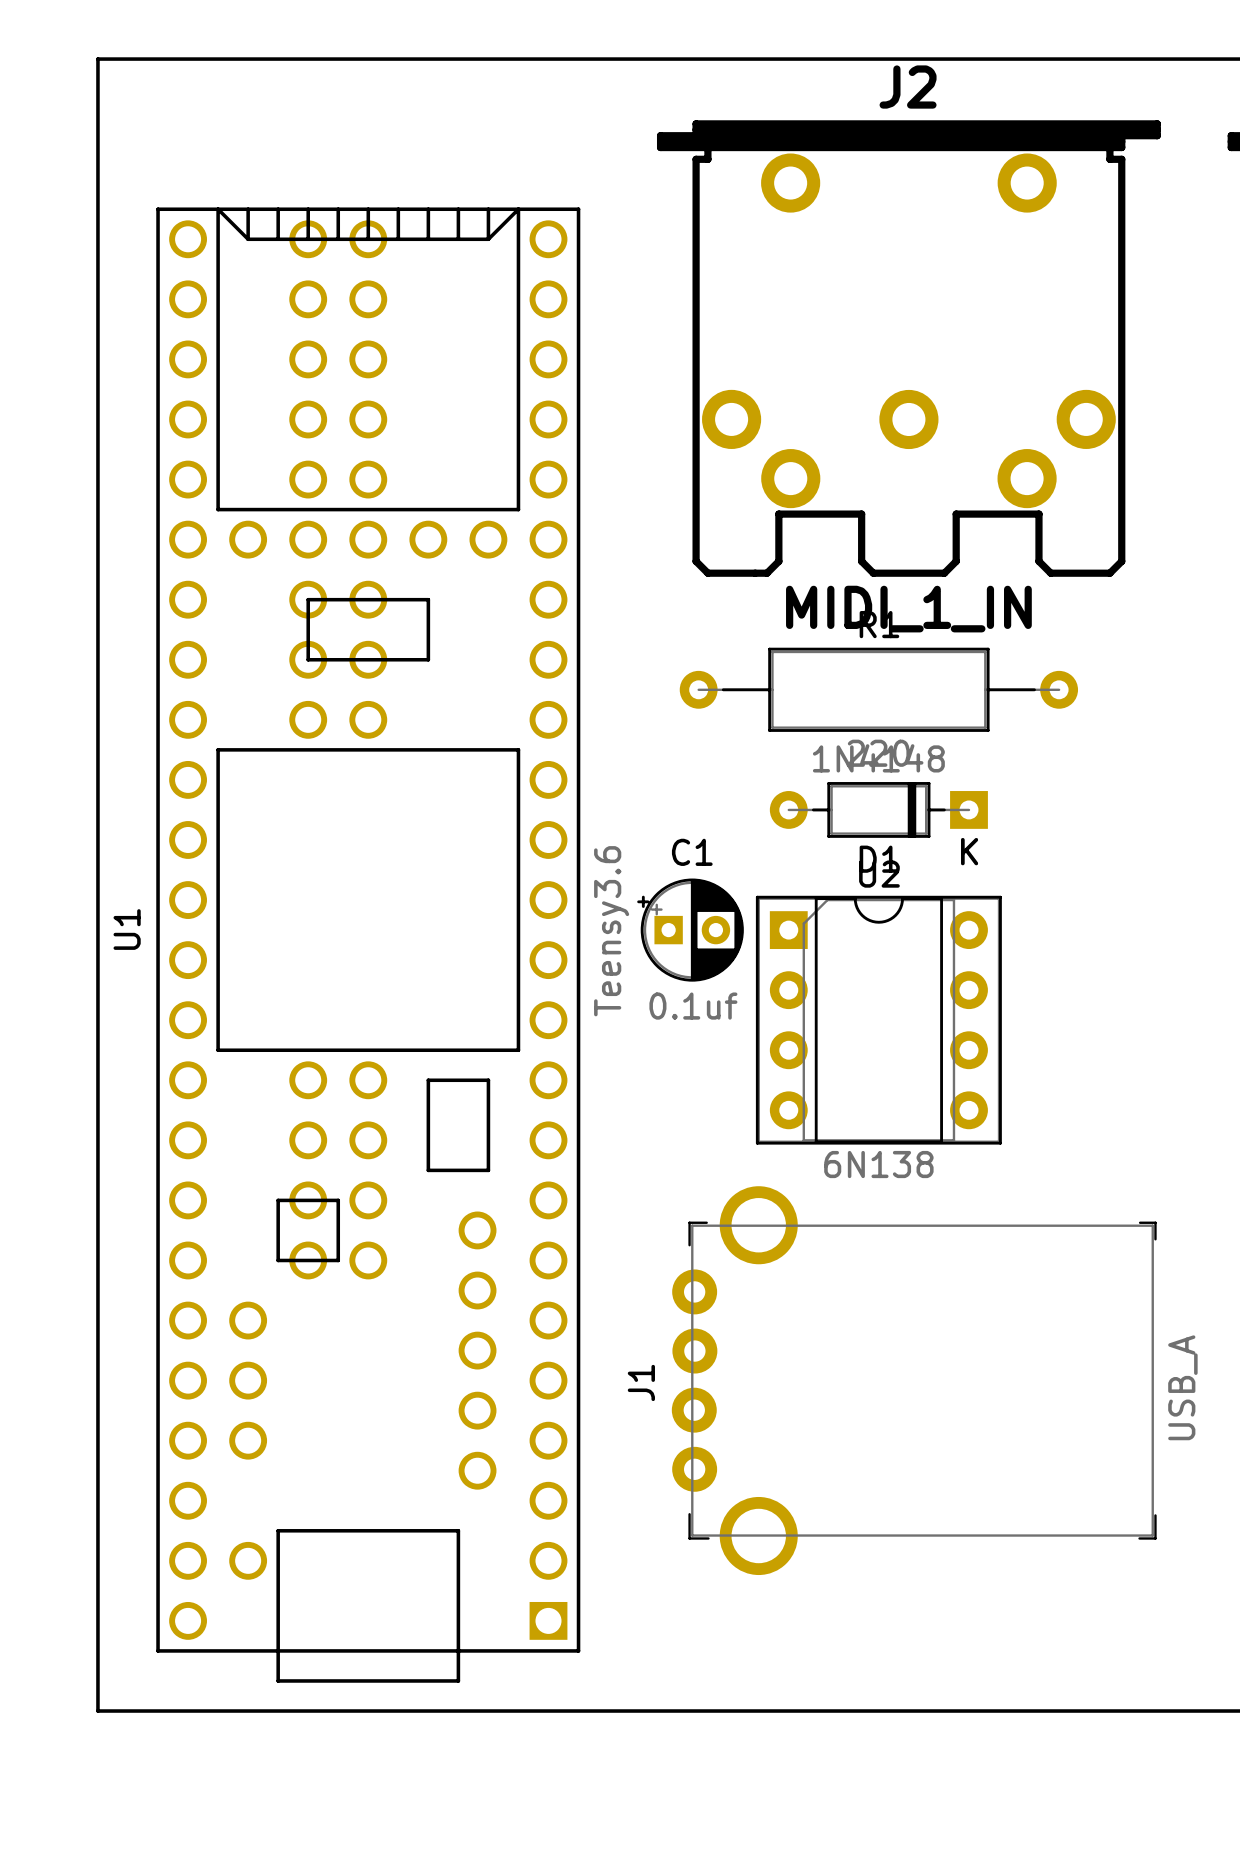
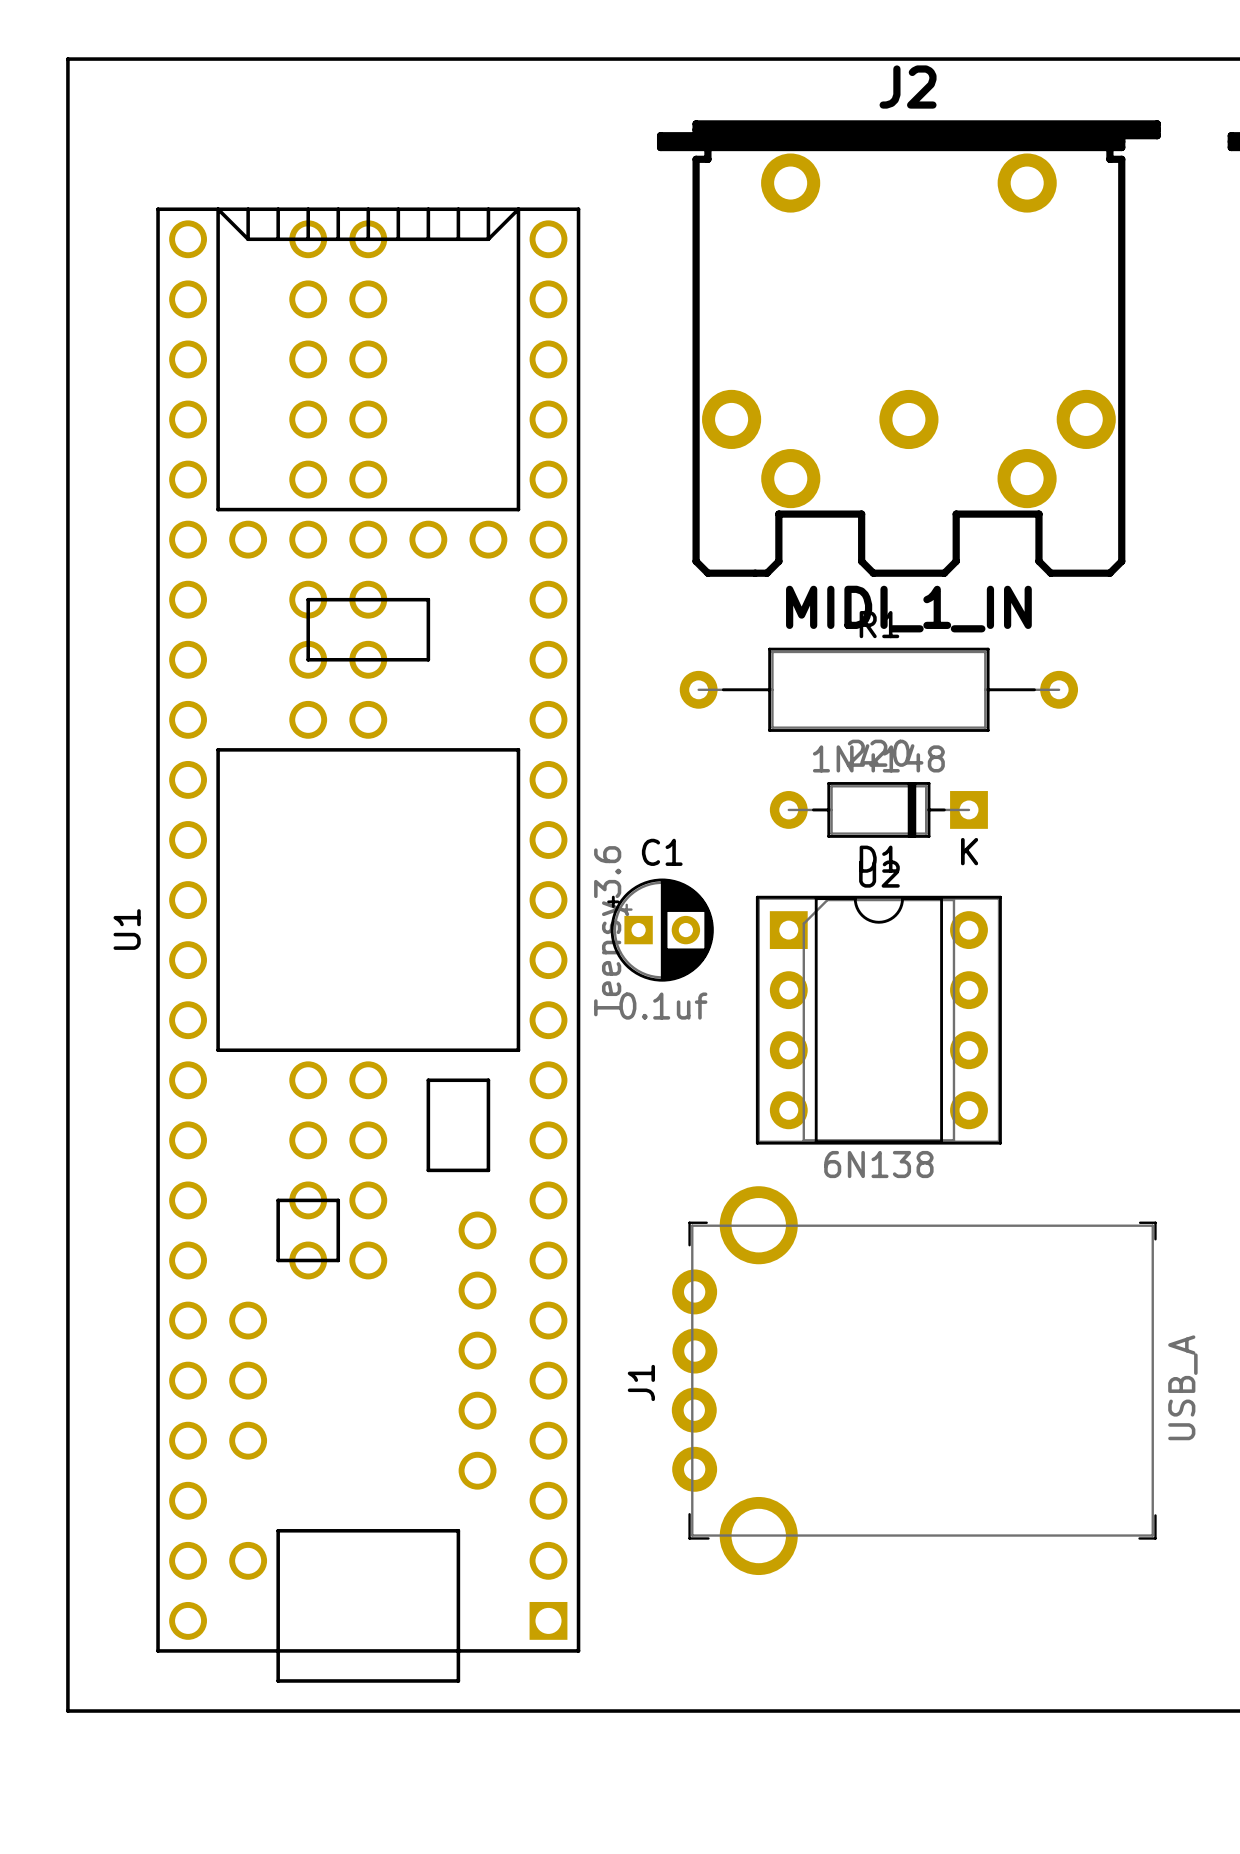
board edge: (97, 59) (97, 1711) -> (97, 59) (67, 59) (67, 1711) (97, 1711)
C1 position: (690, 930) -> (660, 930)

